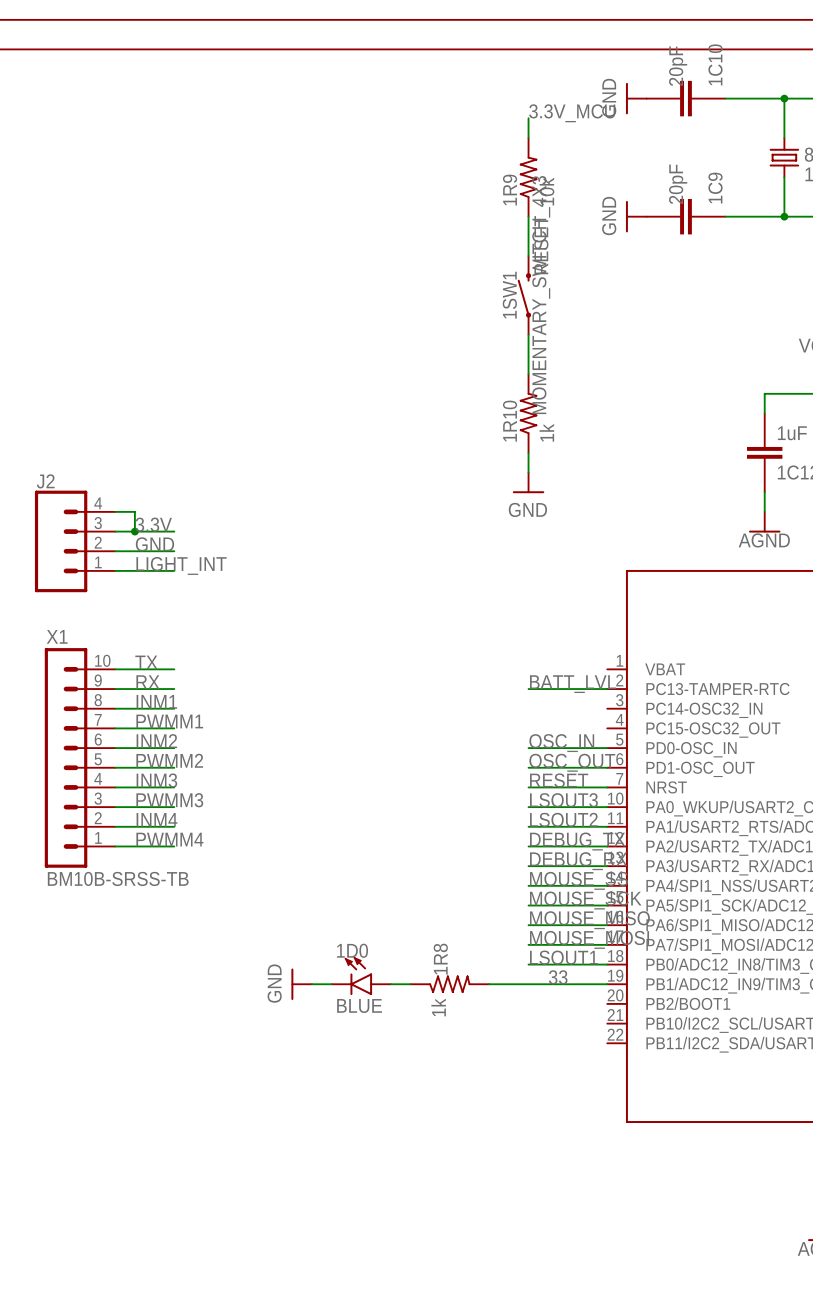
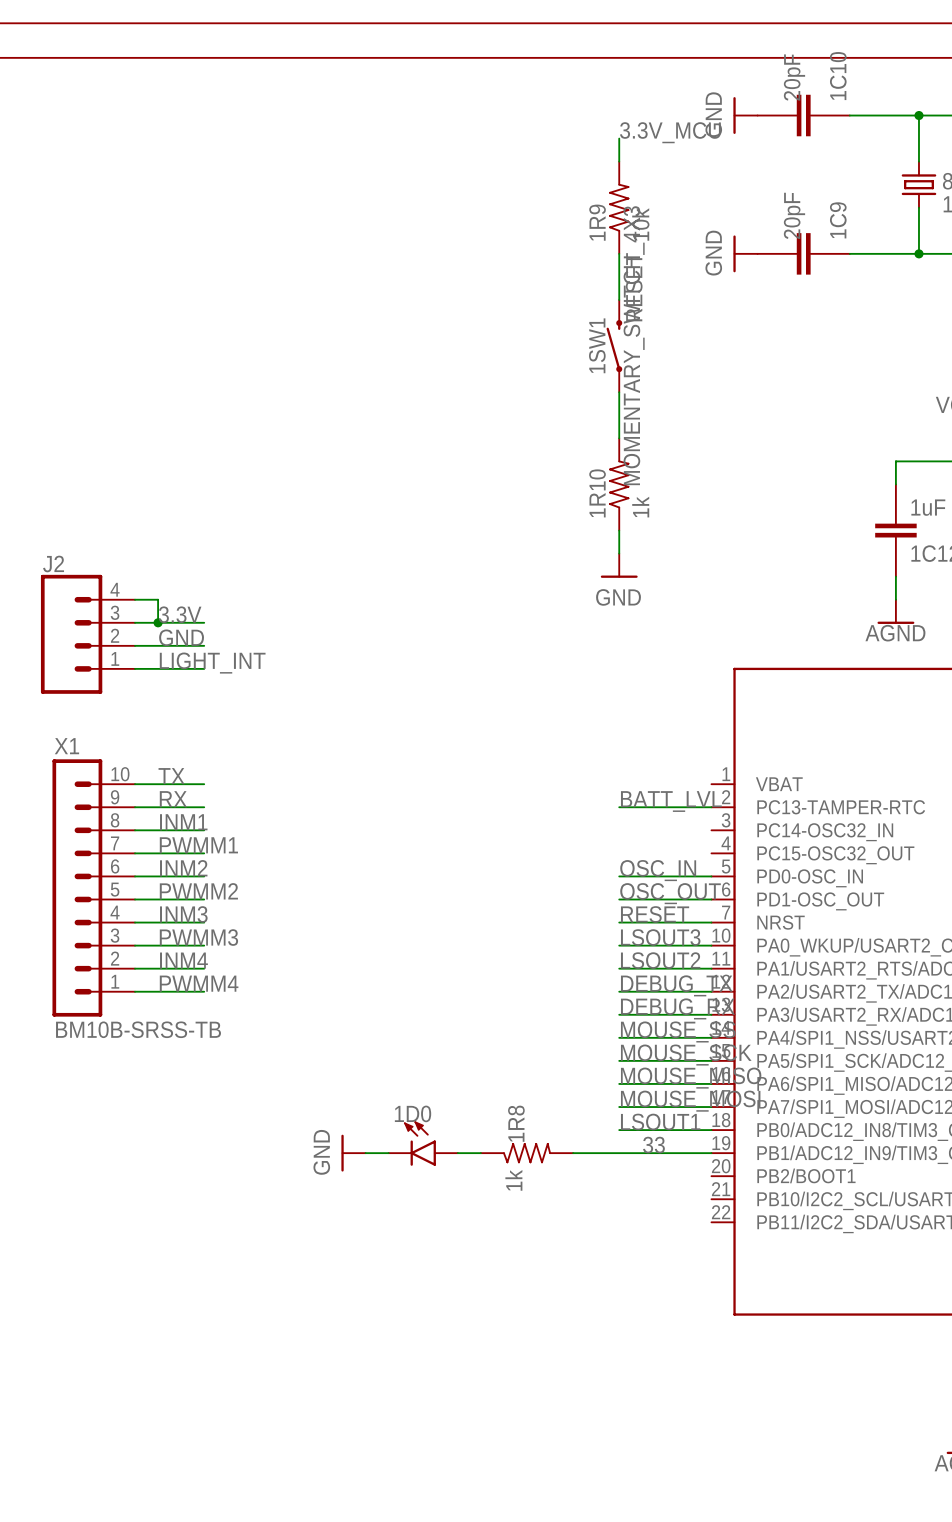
1D0 value: BLUE (359, 1005) -> none

